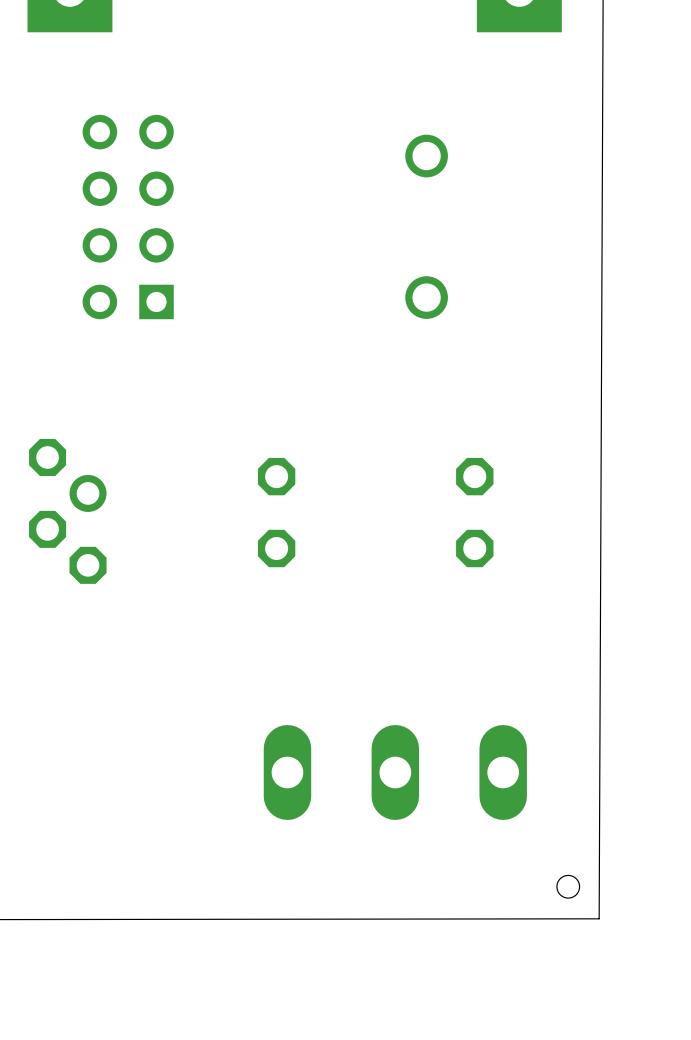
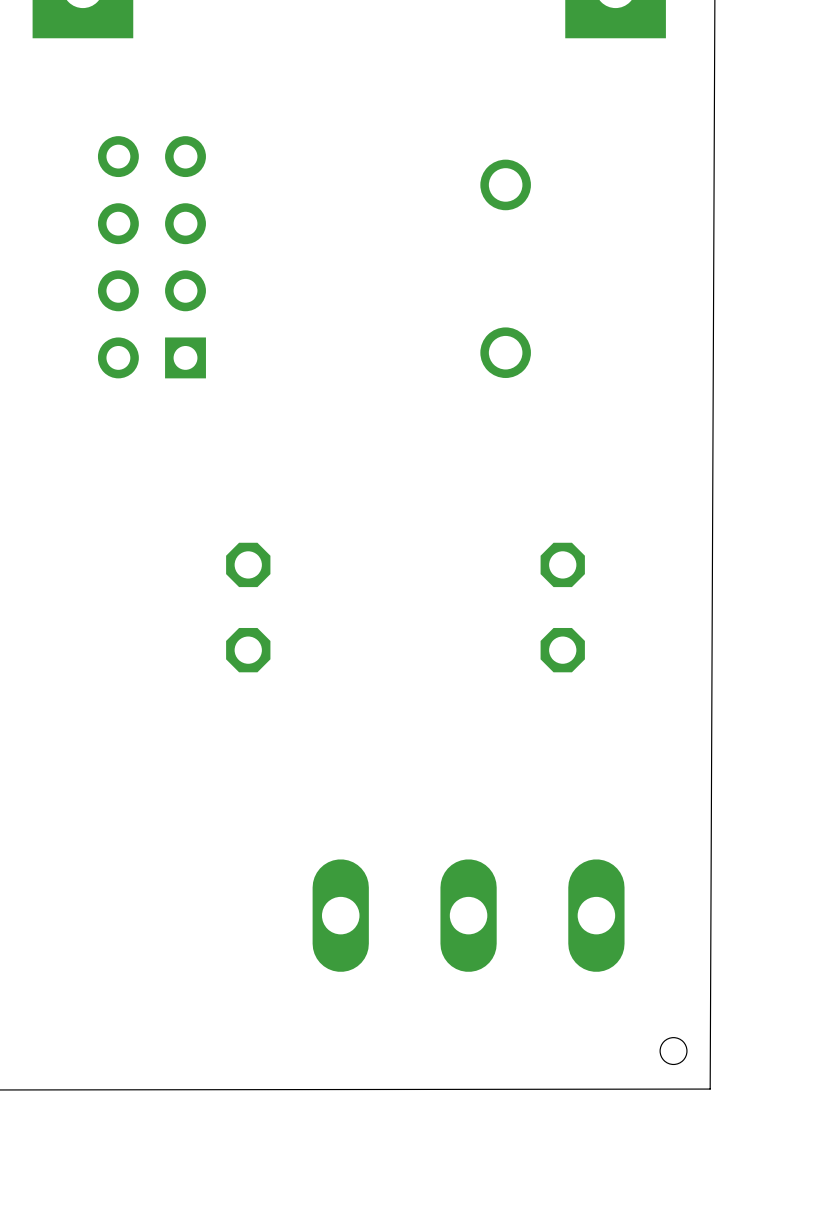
part: (67, 511) -> none
part position: (276, 512) -> (248, 607)

